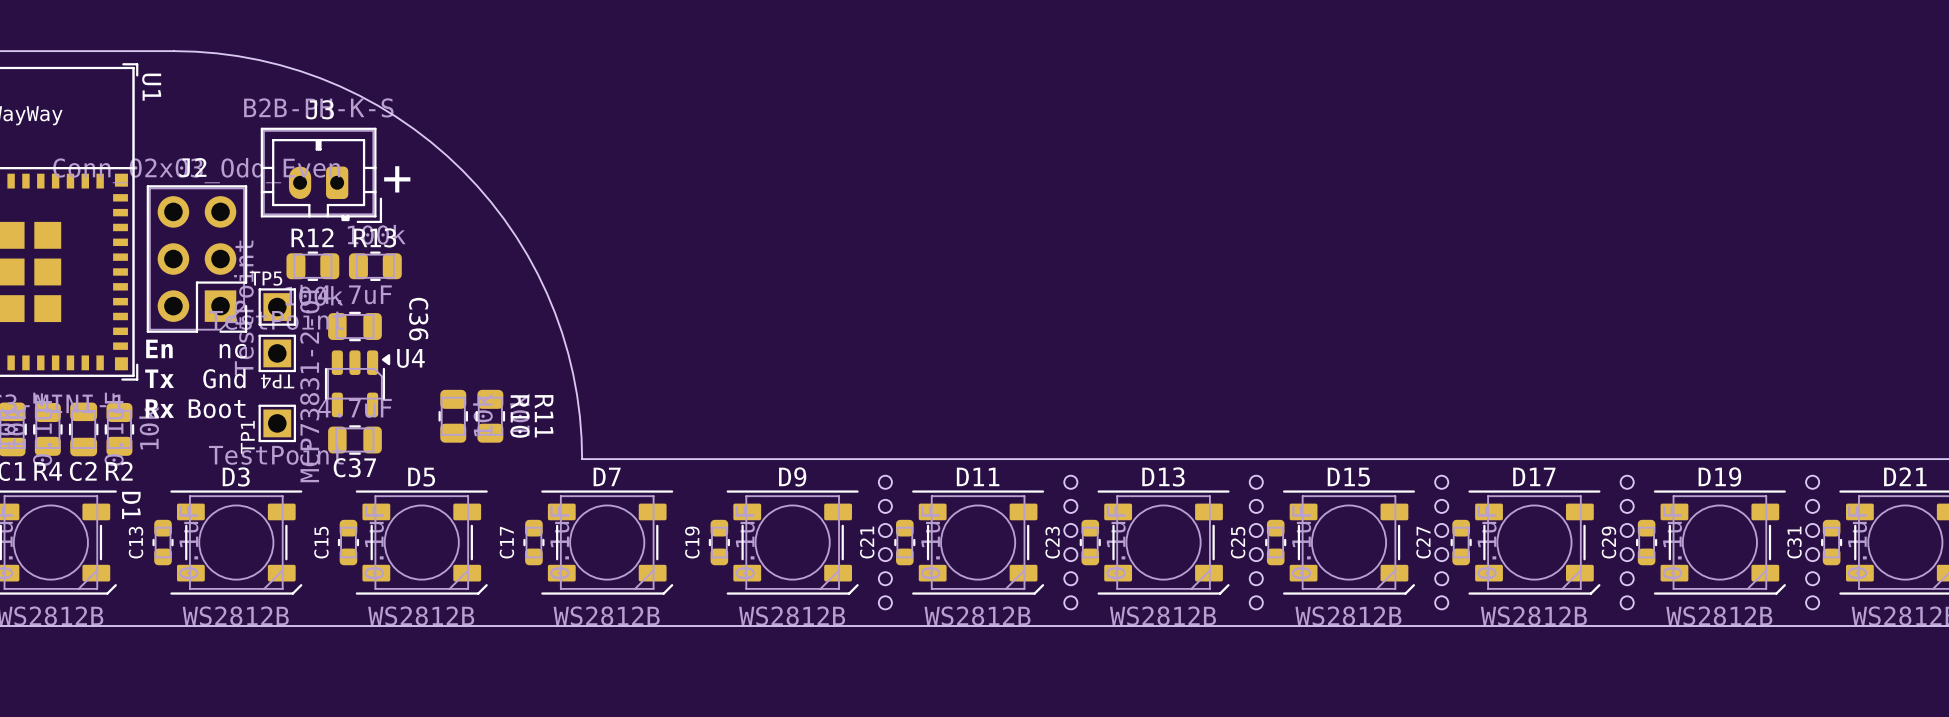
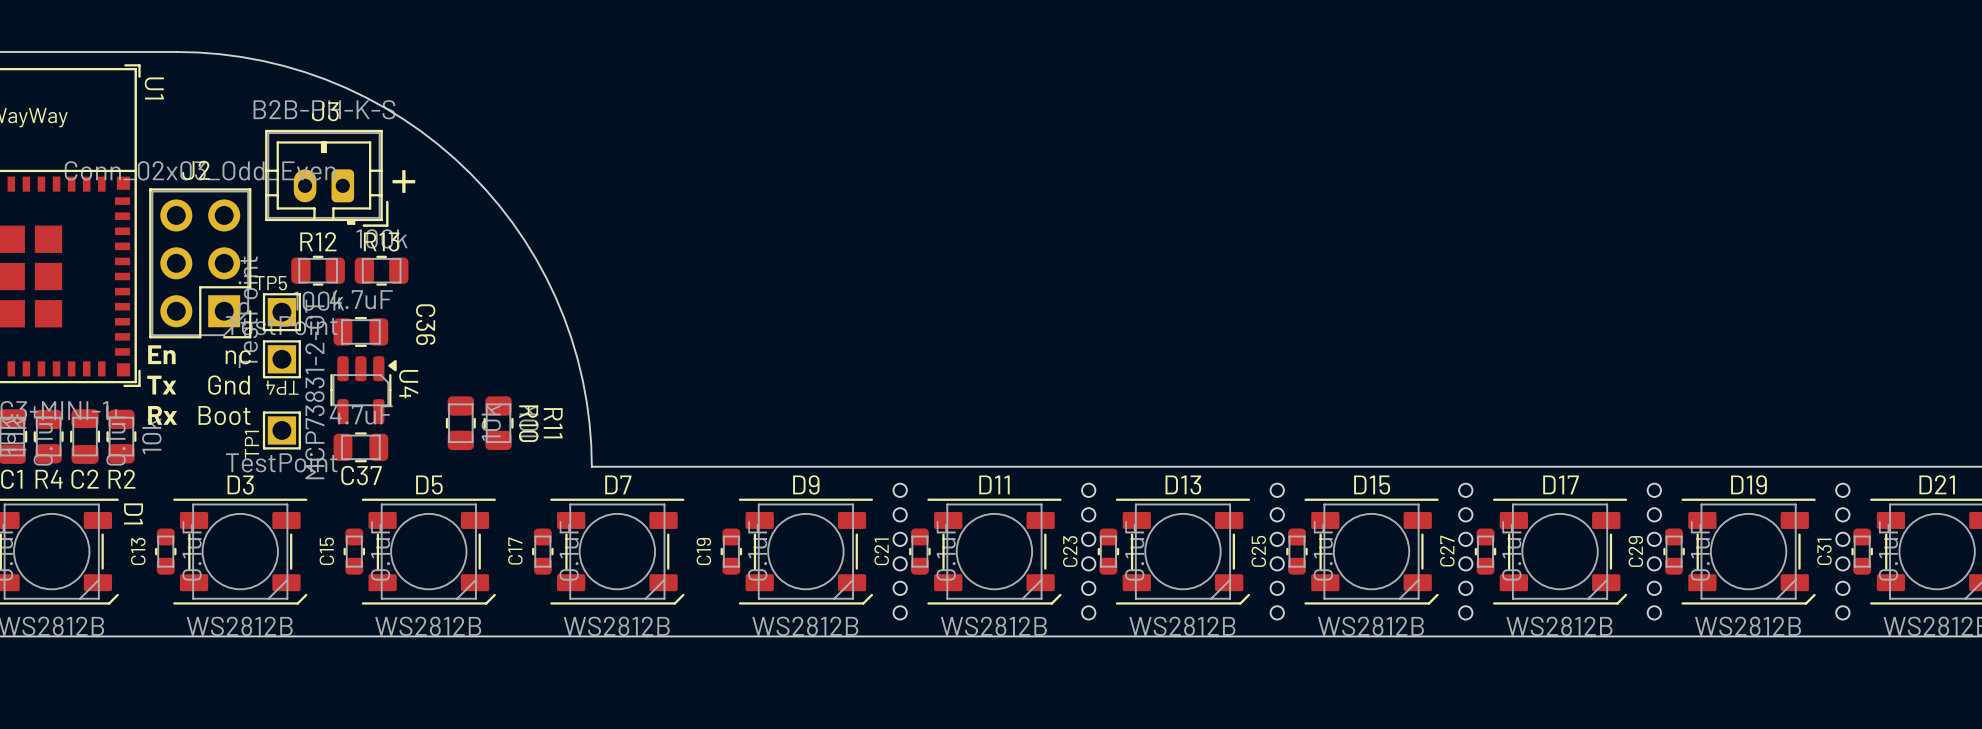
U4 name rotation: 0° (410, 358) -> 90° clockwise (408, 384)

